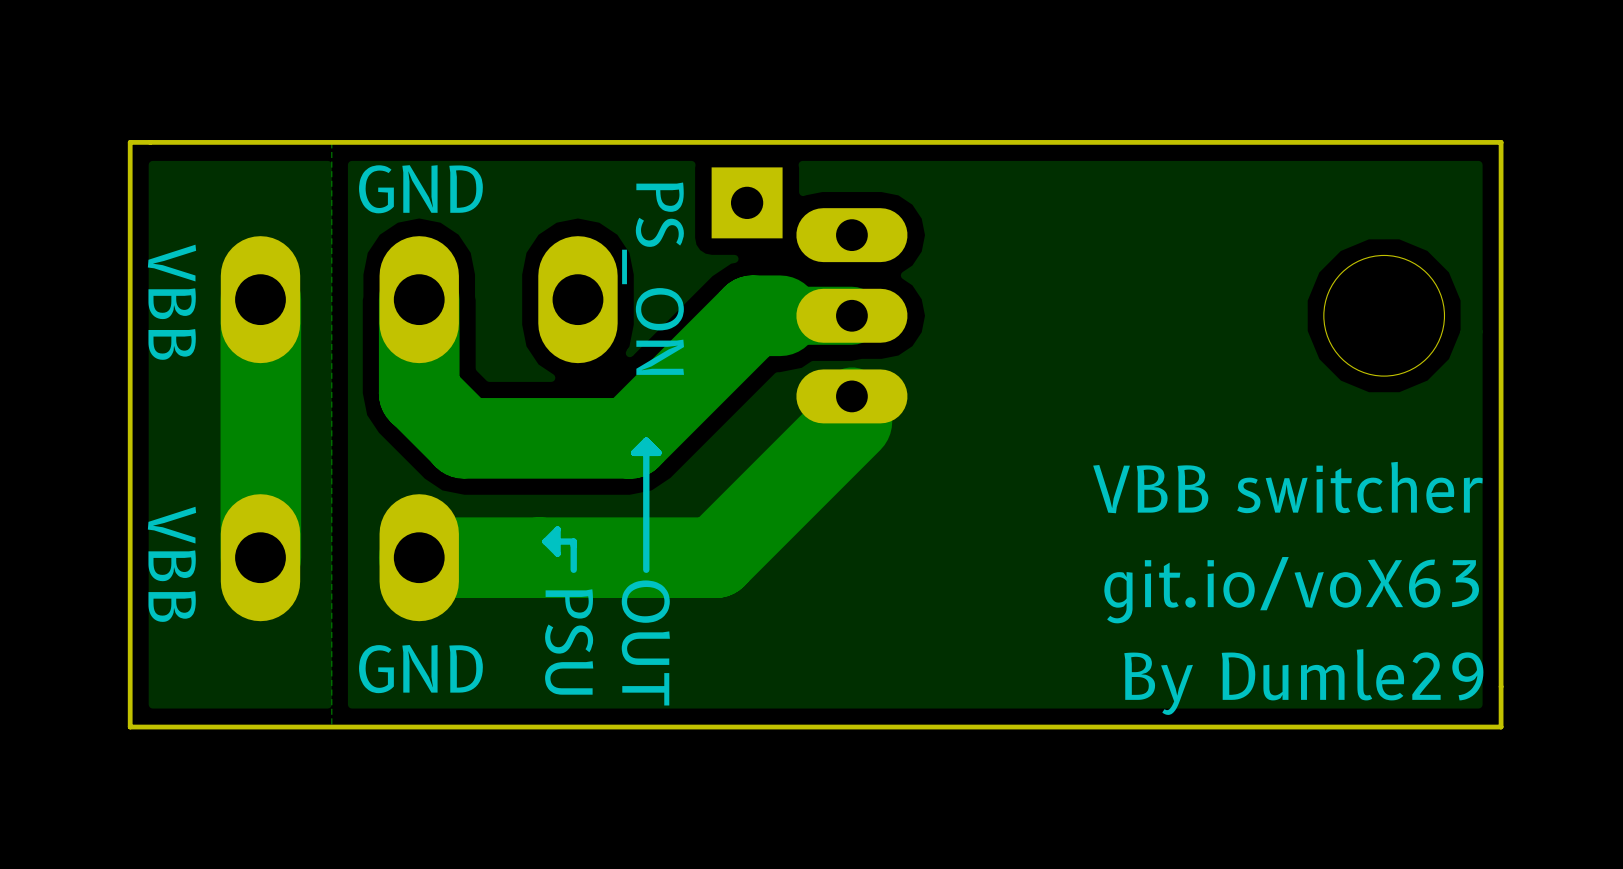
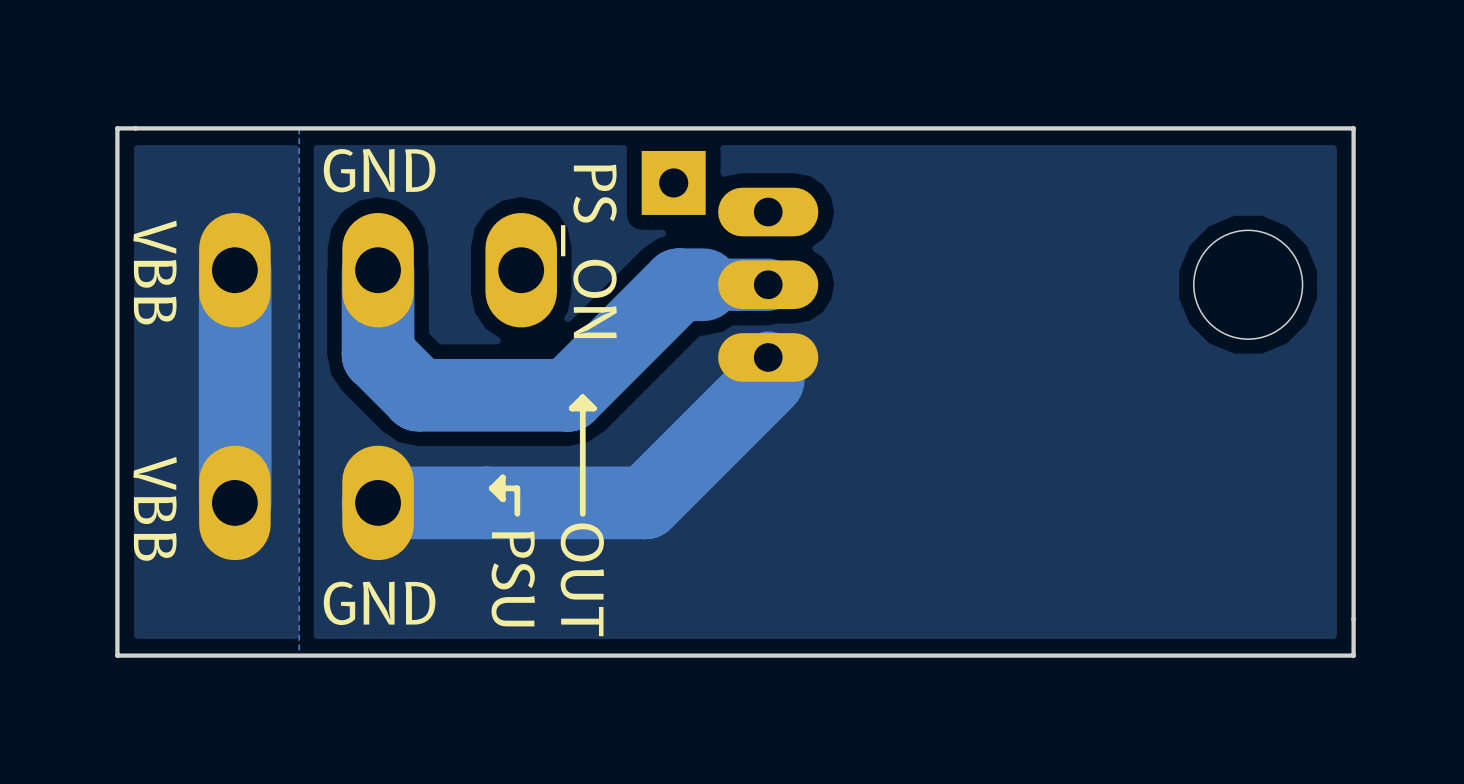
text: VBB switcher (1287, 487) -> none
text: git.io/voX63 (1291, 590) -> none
text: By Dumle29 (1303, 682) -> none

